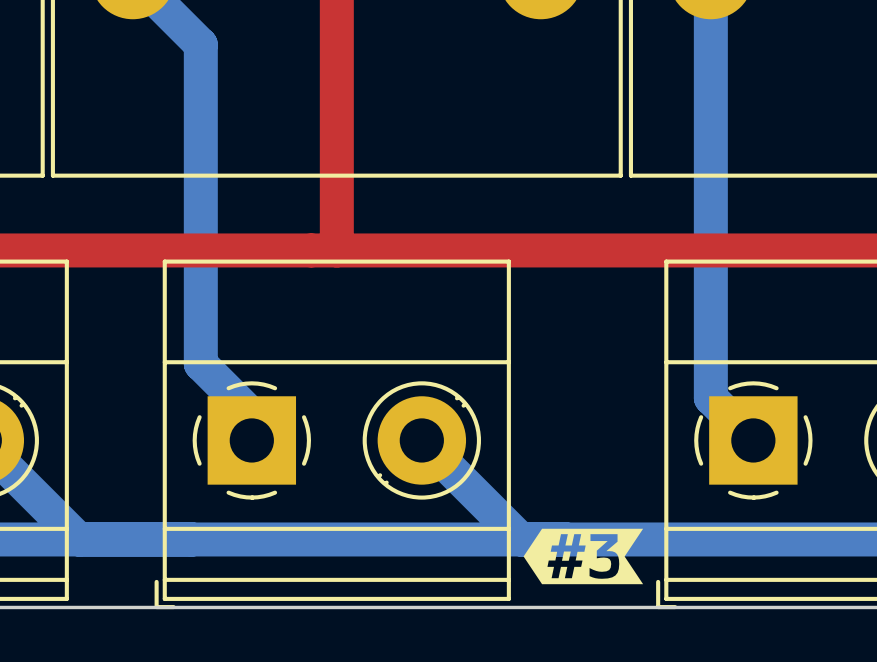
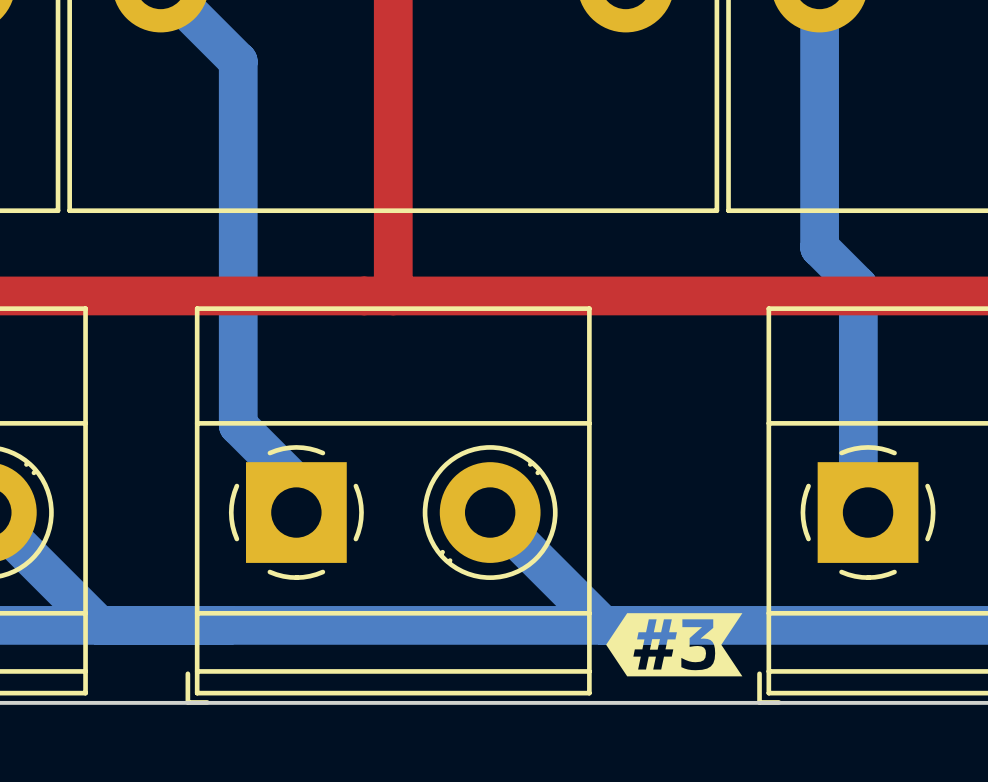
bottom track: (710, 207) (710, 397) (744, 431) -> (819, 247) (858, 286) (858, 502)

